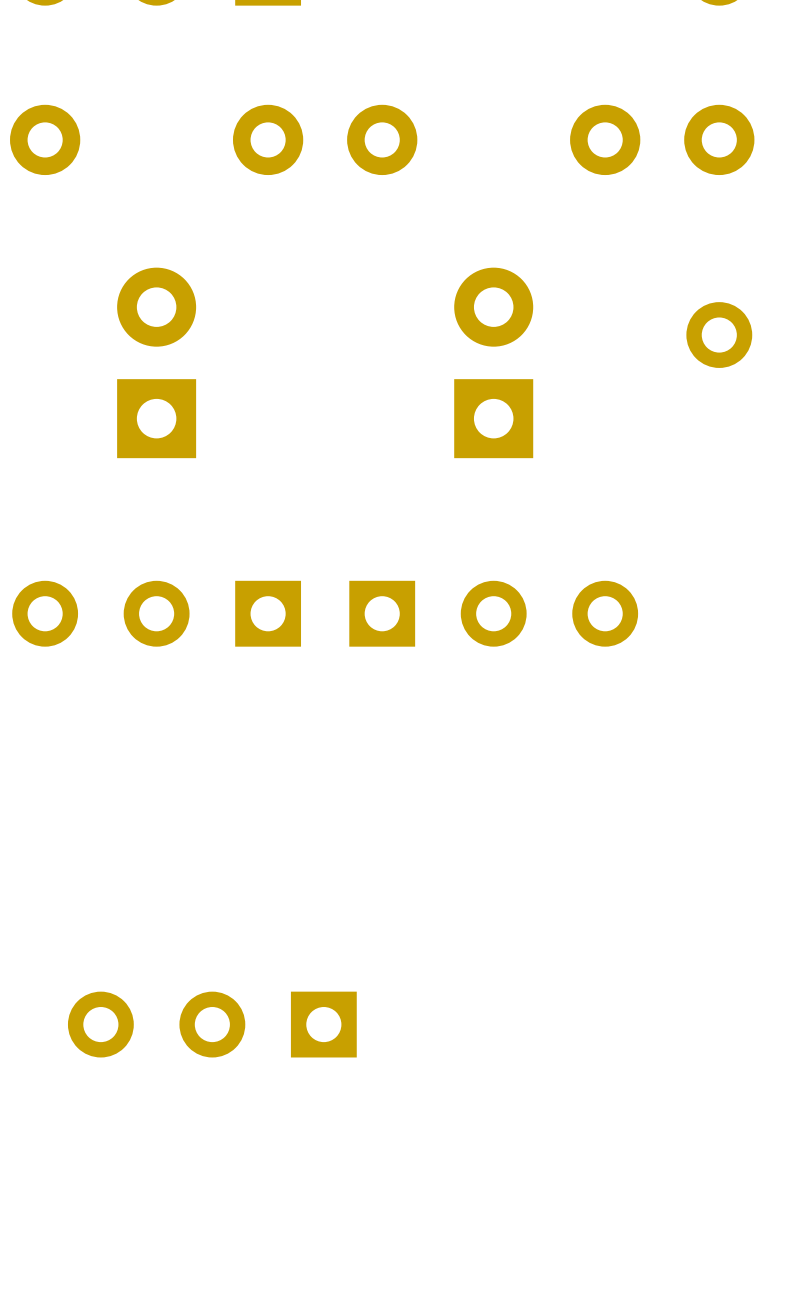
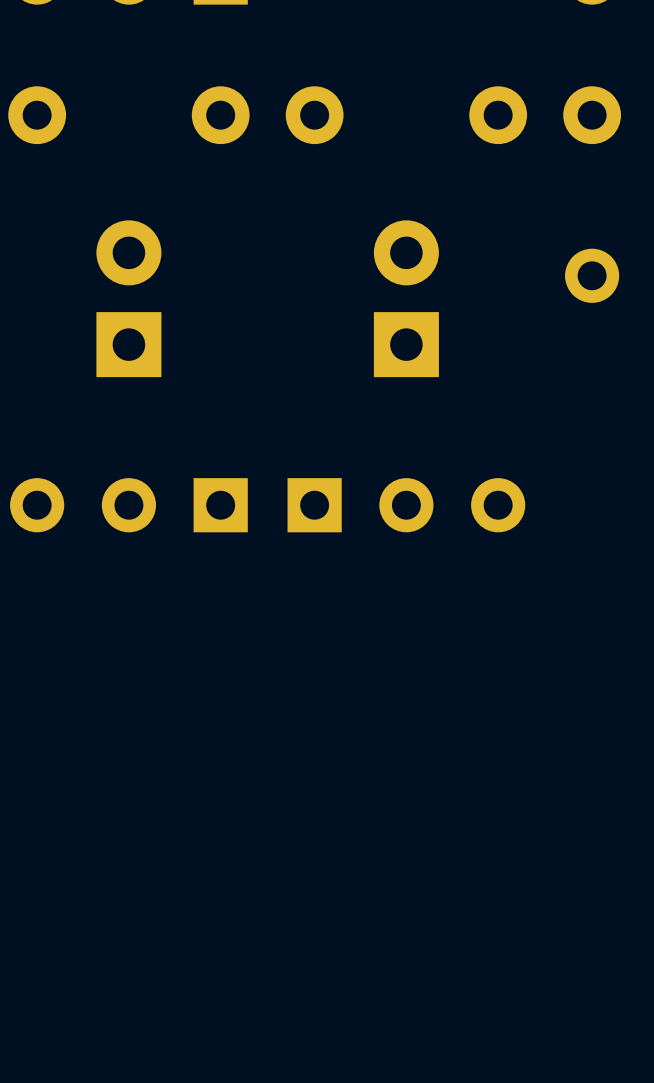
part: (212, 1024) -> none

